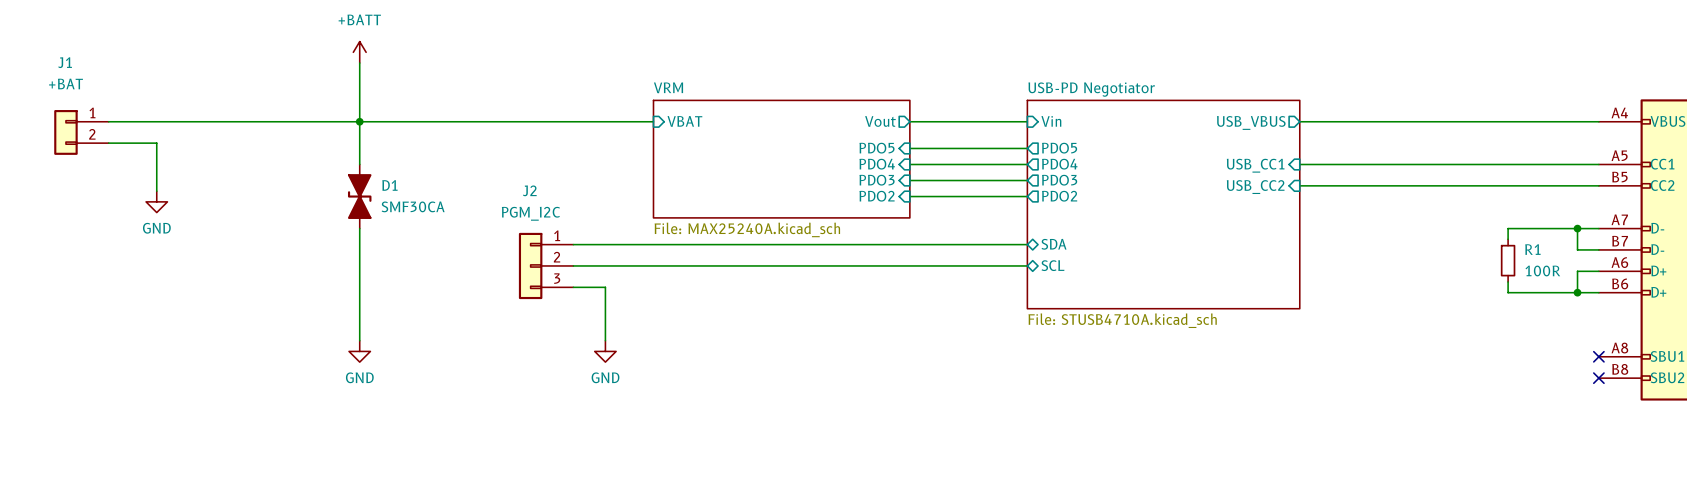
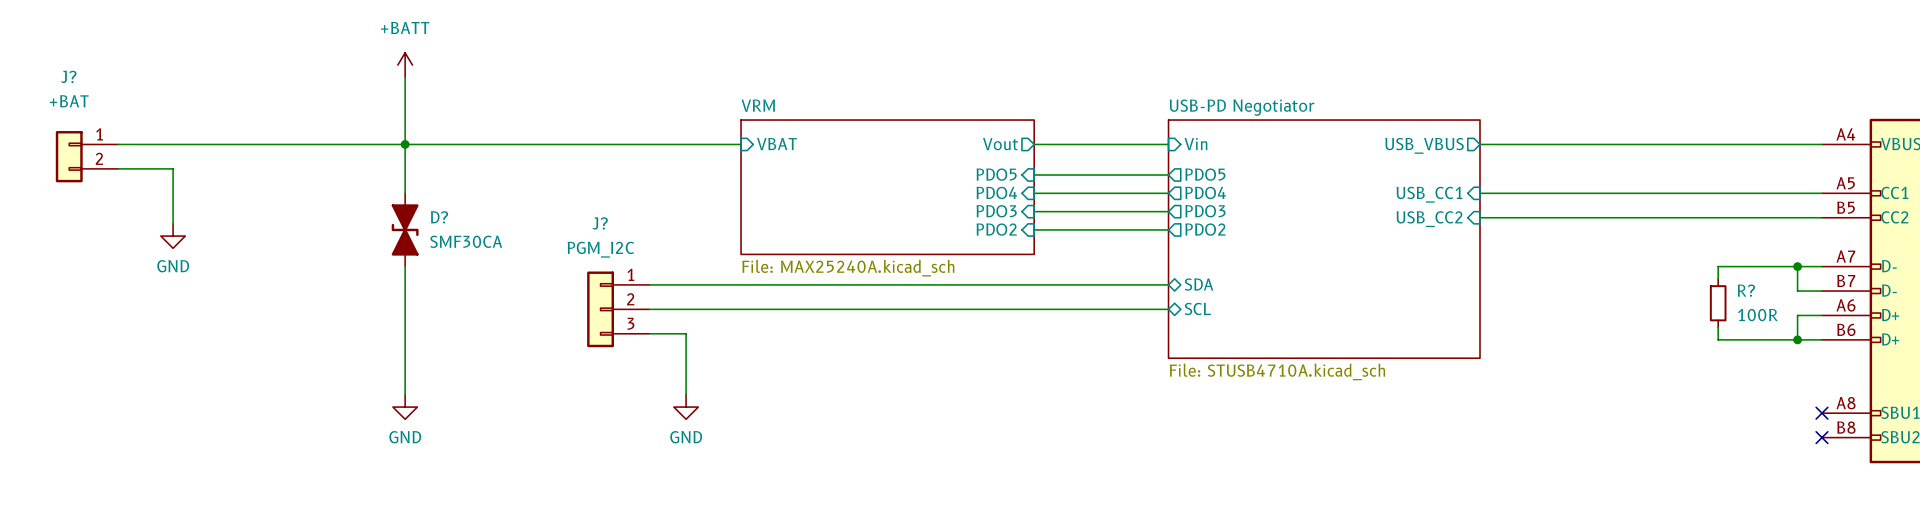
J1 name: J1 (65, 62) -> J? (68, 76)
D1 name: D1 (389, 185) -> D? (439, 217)
J2 name: J2 (529, 190) -> J? (600, 223)
R1 name: R1 (1532, 249) -> R? (1746, 290)

